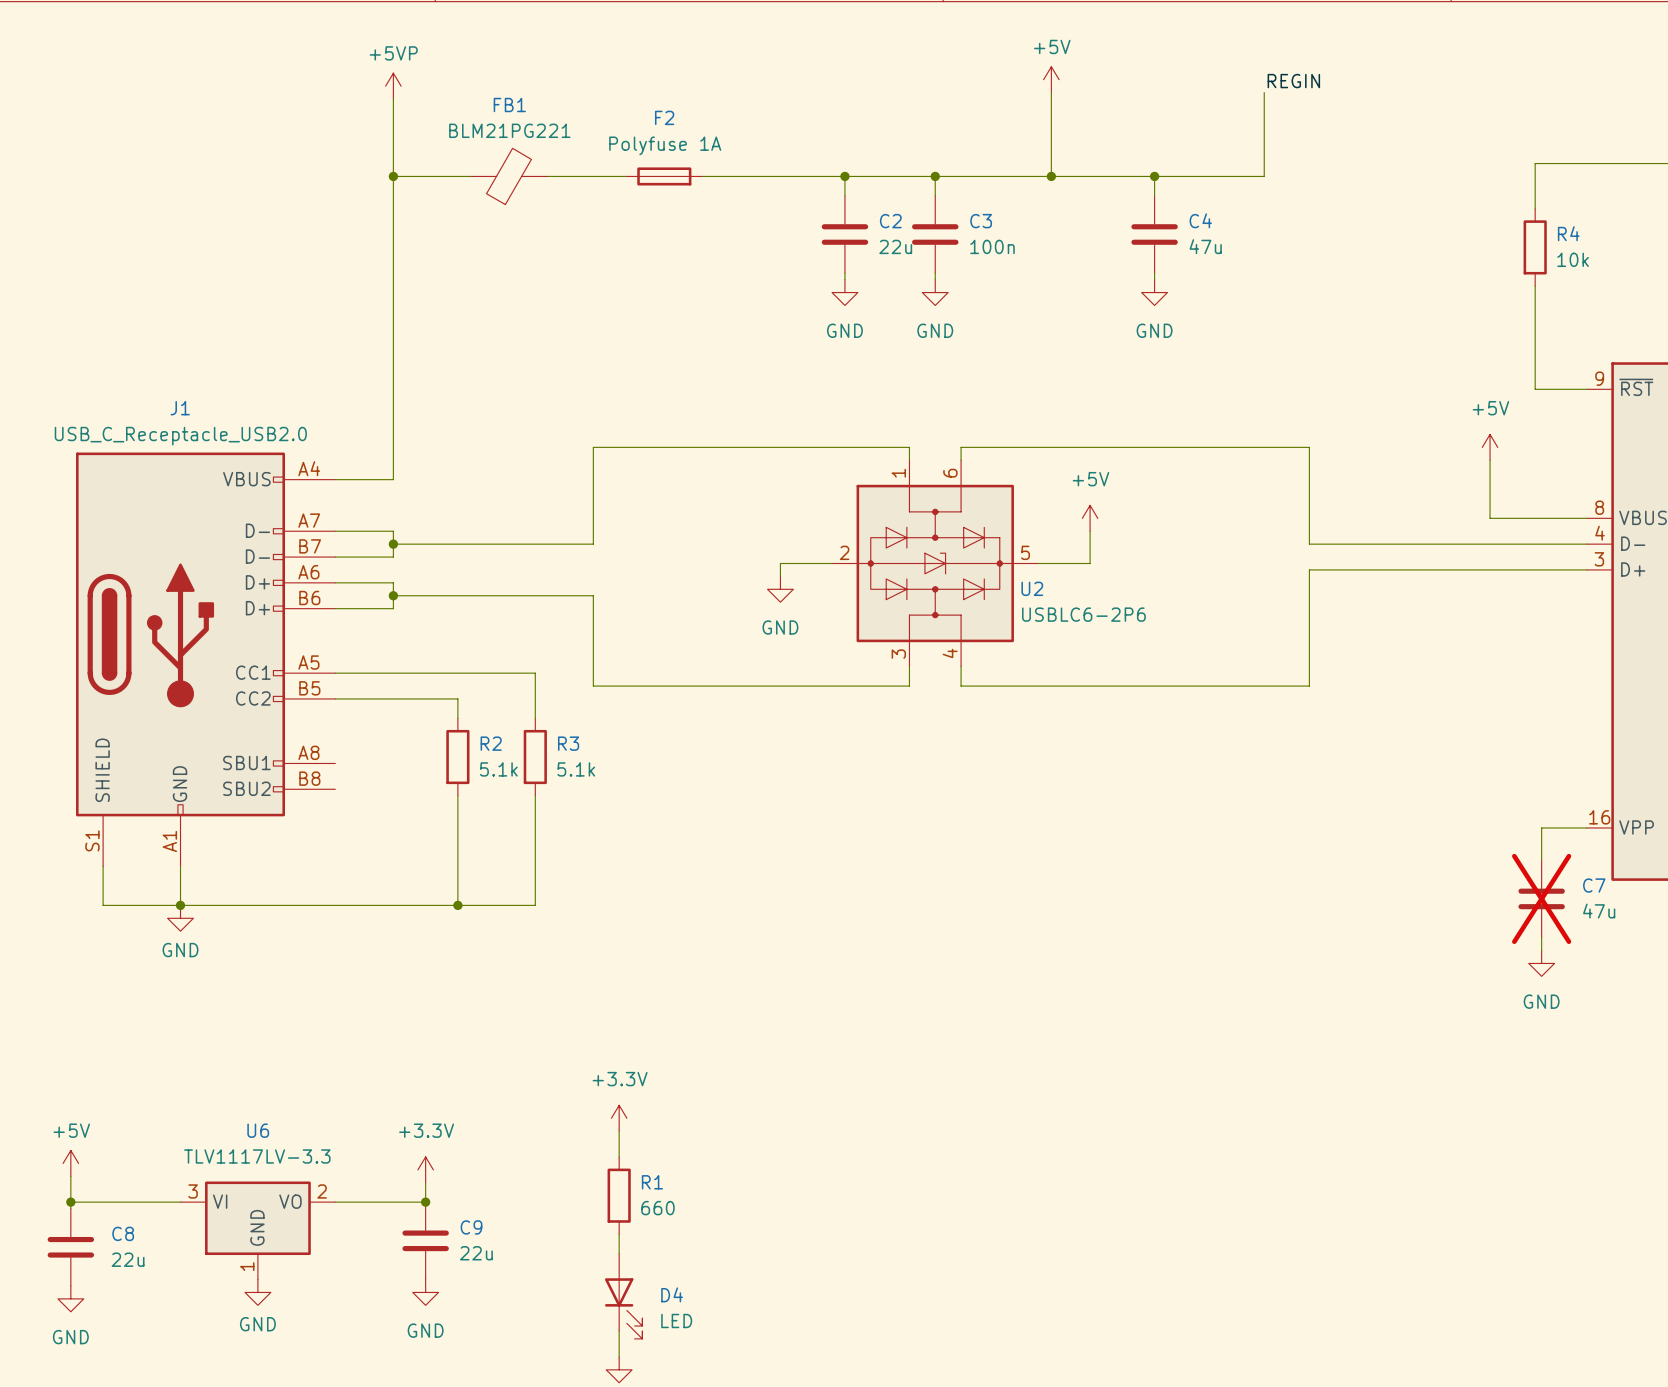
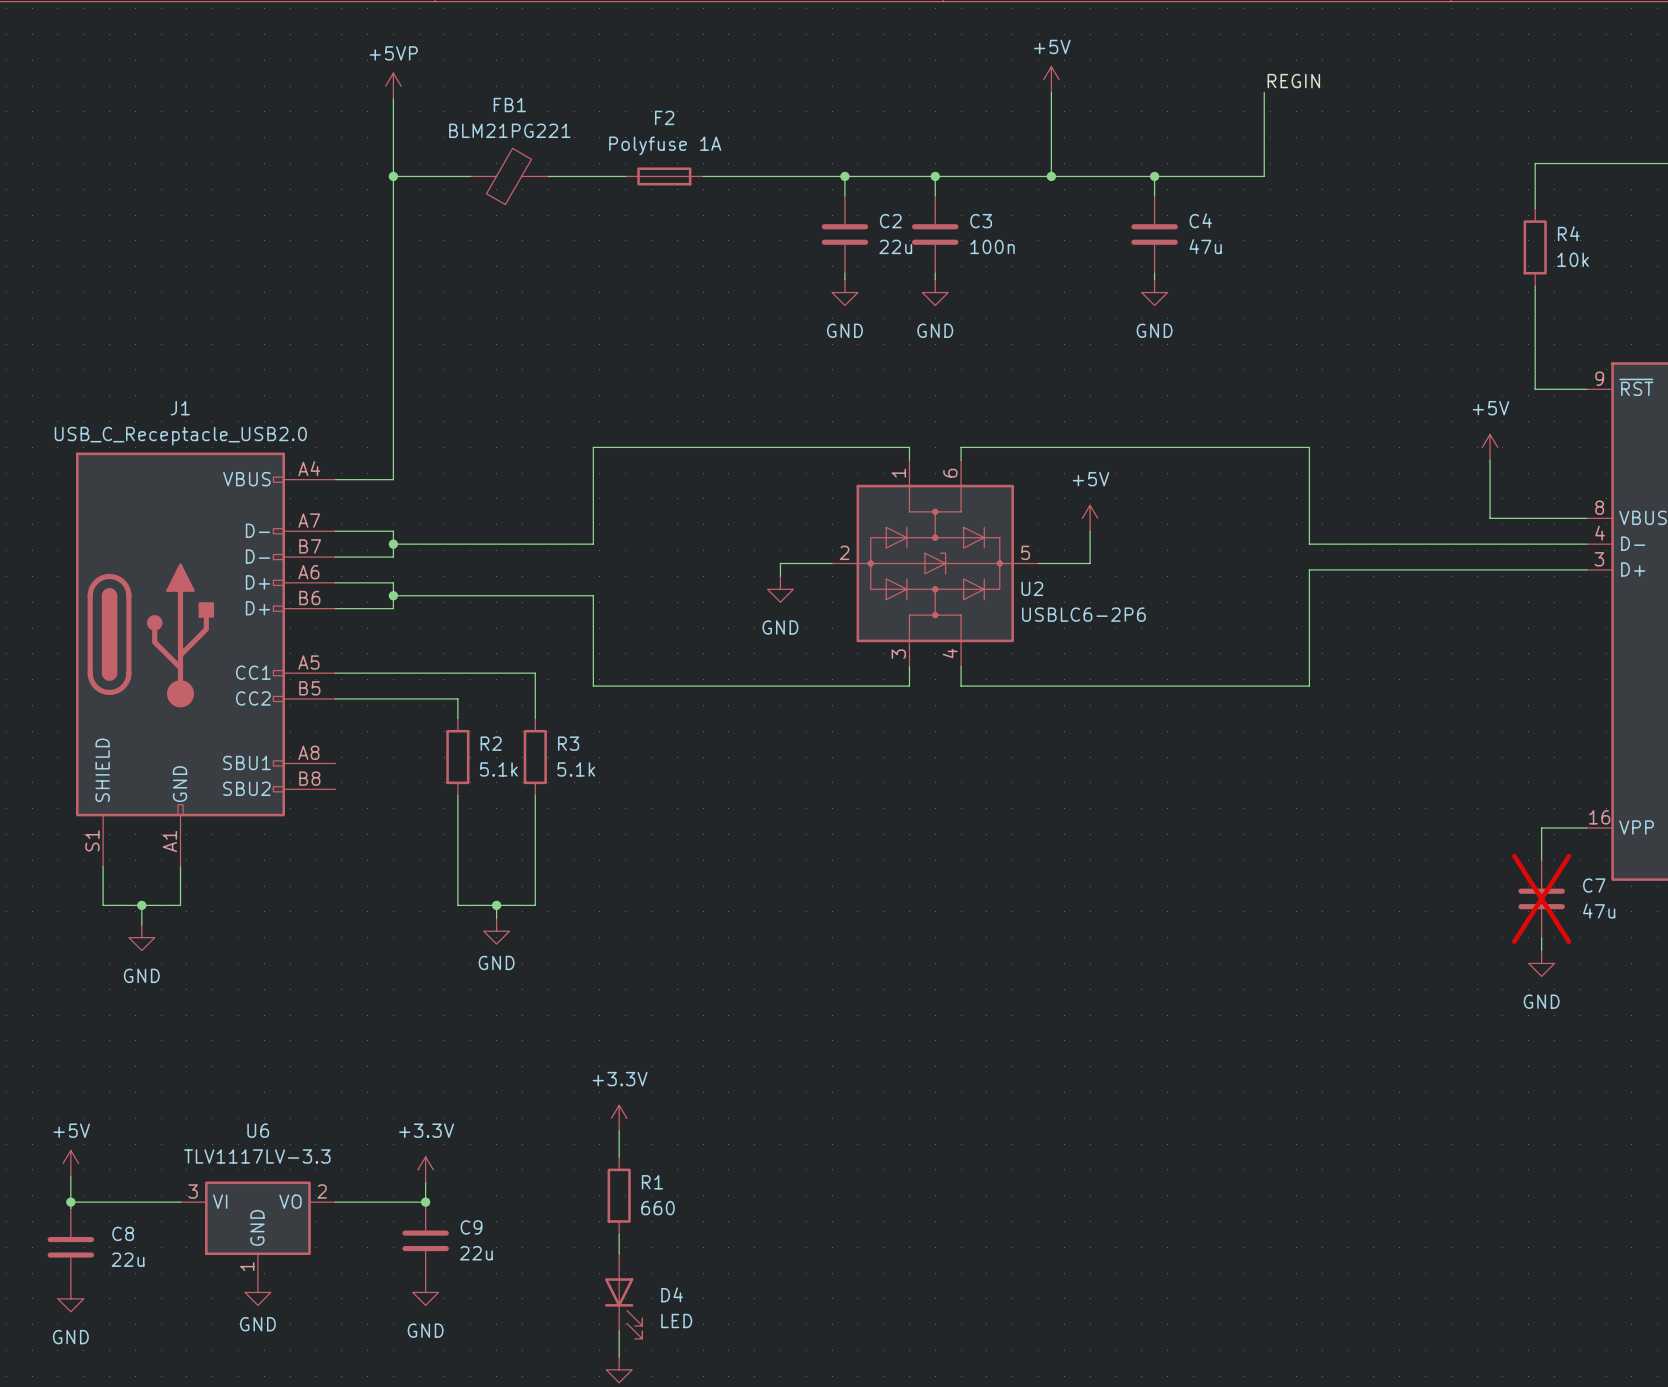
wire: none -> (141, 905) (141, 924)
wire: (180, 905) (457, 905) -> none
junction position: (180, 905) -> (141, 905)
junction position: (457, 905) -> (496, 905)
wire: none -> (496, 905) (496, 918)
power symbol position: GND (180, 918) -> GND (141, 937)
power symbol: none -> GND (496, 931)
power symbol text position: GND (180, 950) -> GND (141, 975)

